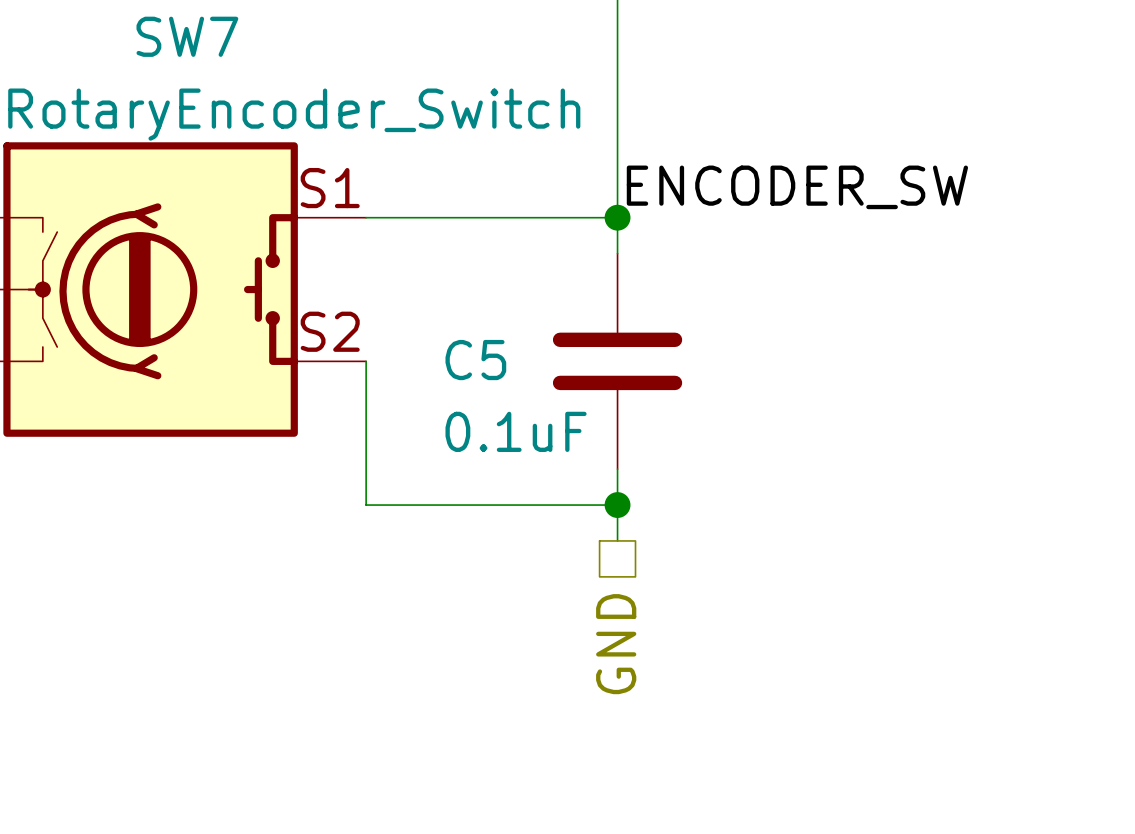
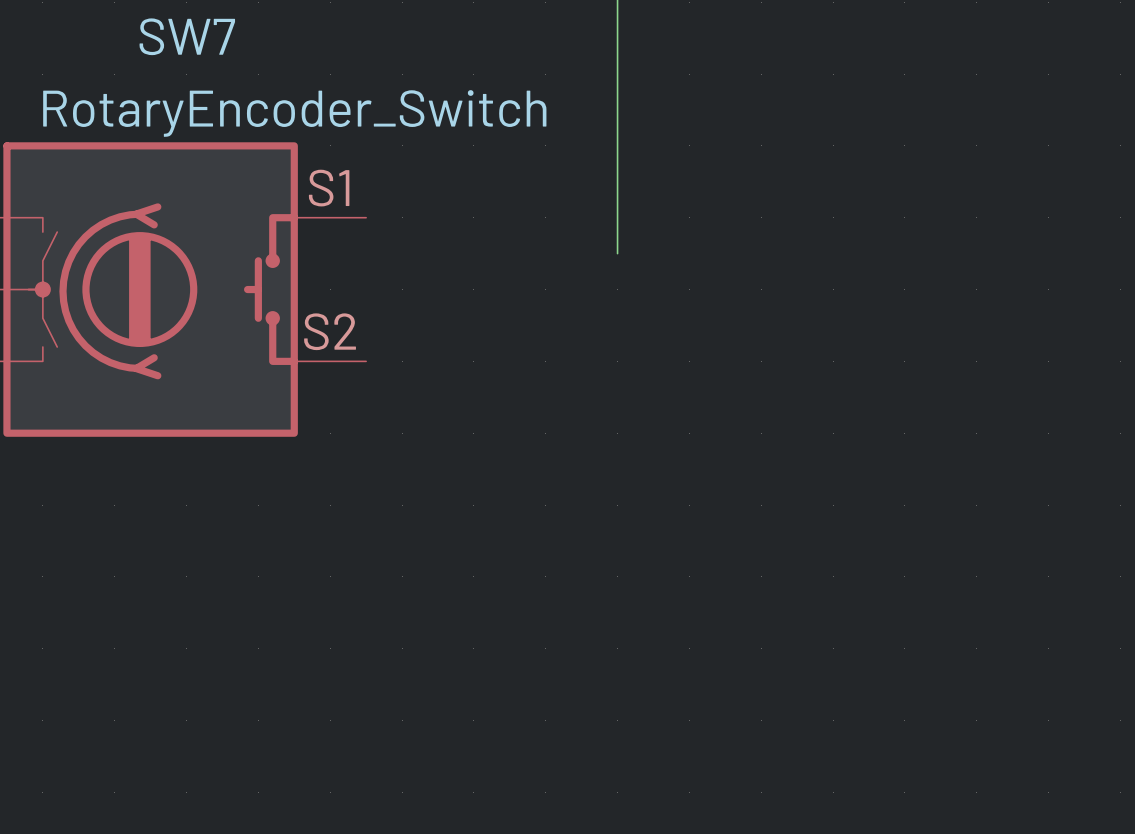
label: ENCODER_SW (797, 187) -> none
wire: (366, 217) (617, 217) -> none
junction: (617, 217) -> none
wire: (366, 361) (366, 505) (617, 505) -> none
C5: 0.1uF (617, 361) -> none
wire: (617, 469) (617, 540) -> none
junction: (617, 505) -> none
hierarchical label: GND (616, 644) -> none

